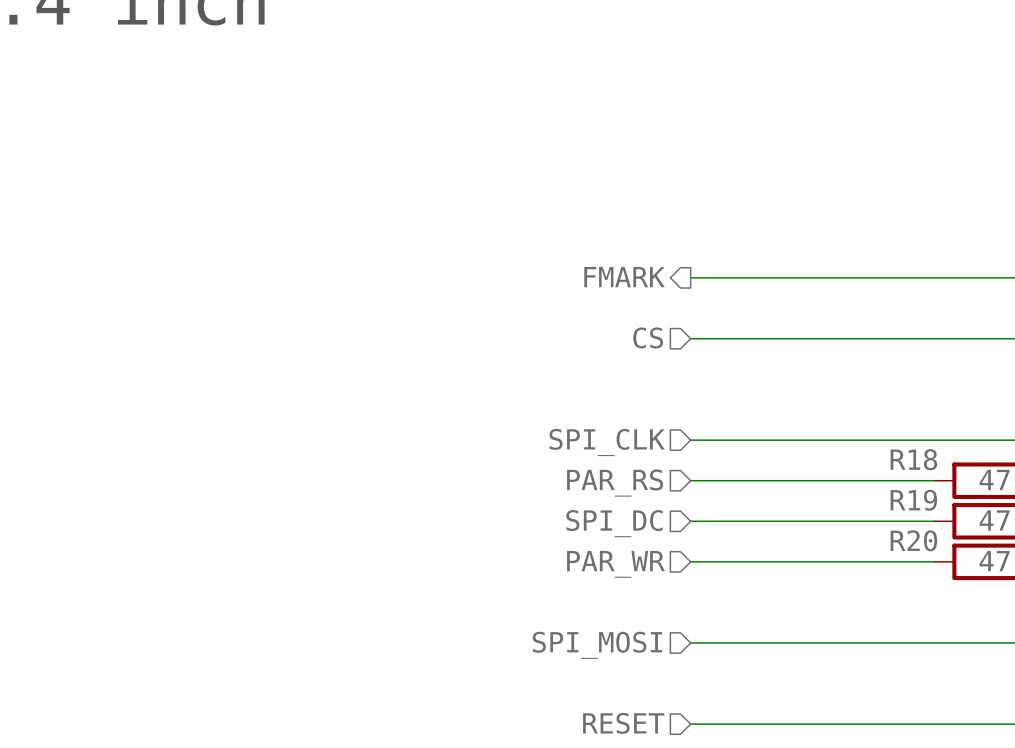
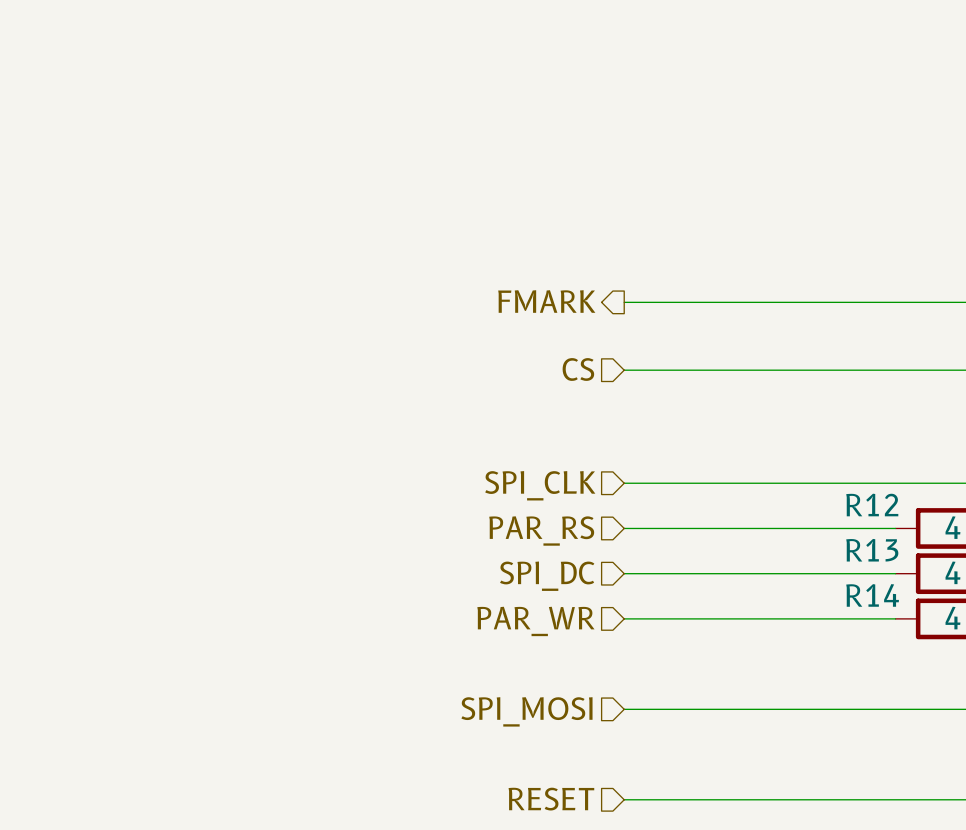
R18 name: R18 (913, 459) -> R12 (872, 505)
R19 name: R19 (913, 500) -> R13 (872, 550)
R20 name: R20 (913, 540) -> R14 (872, 595)

